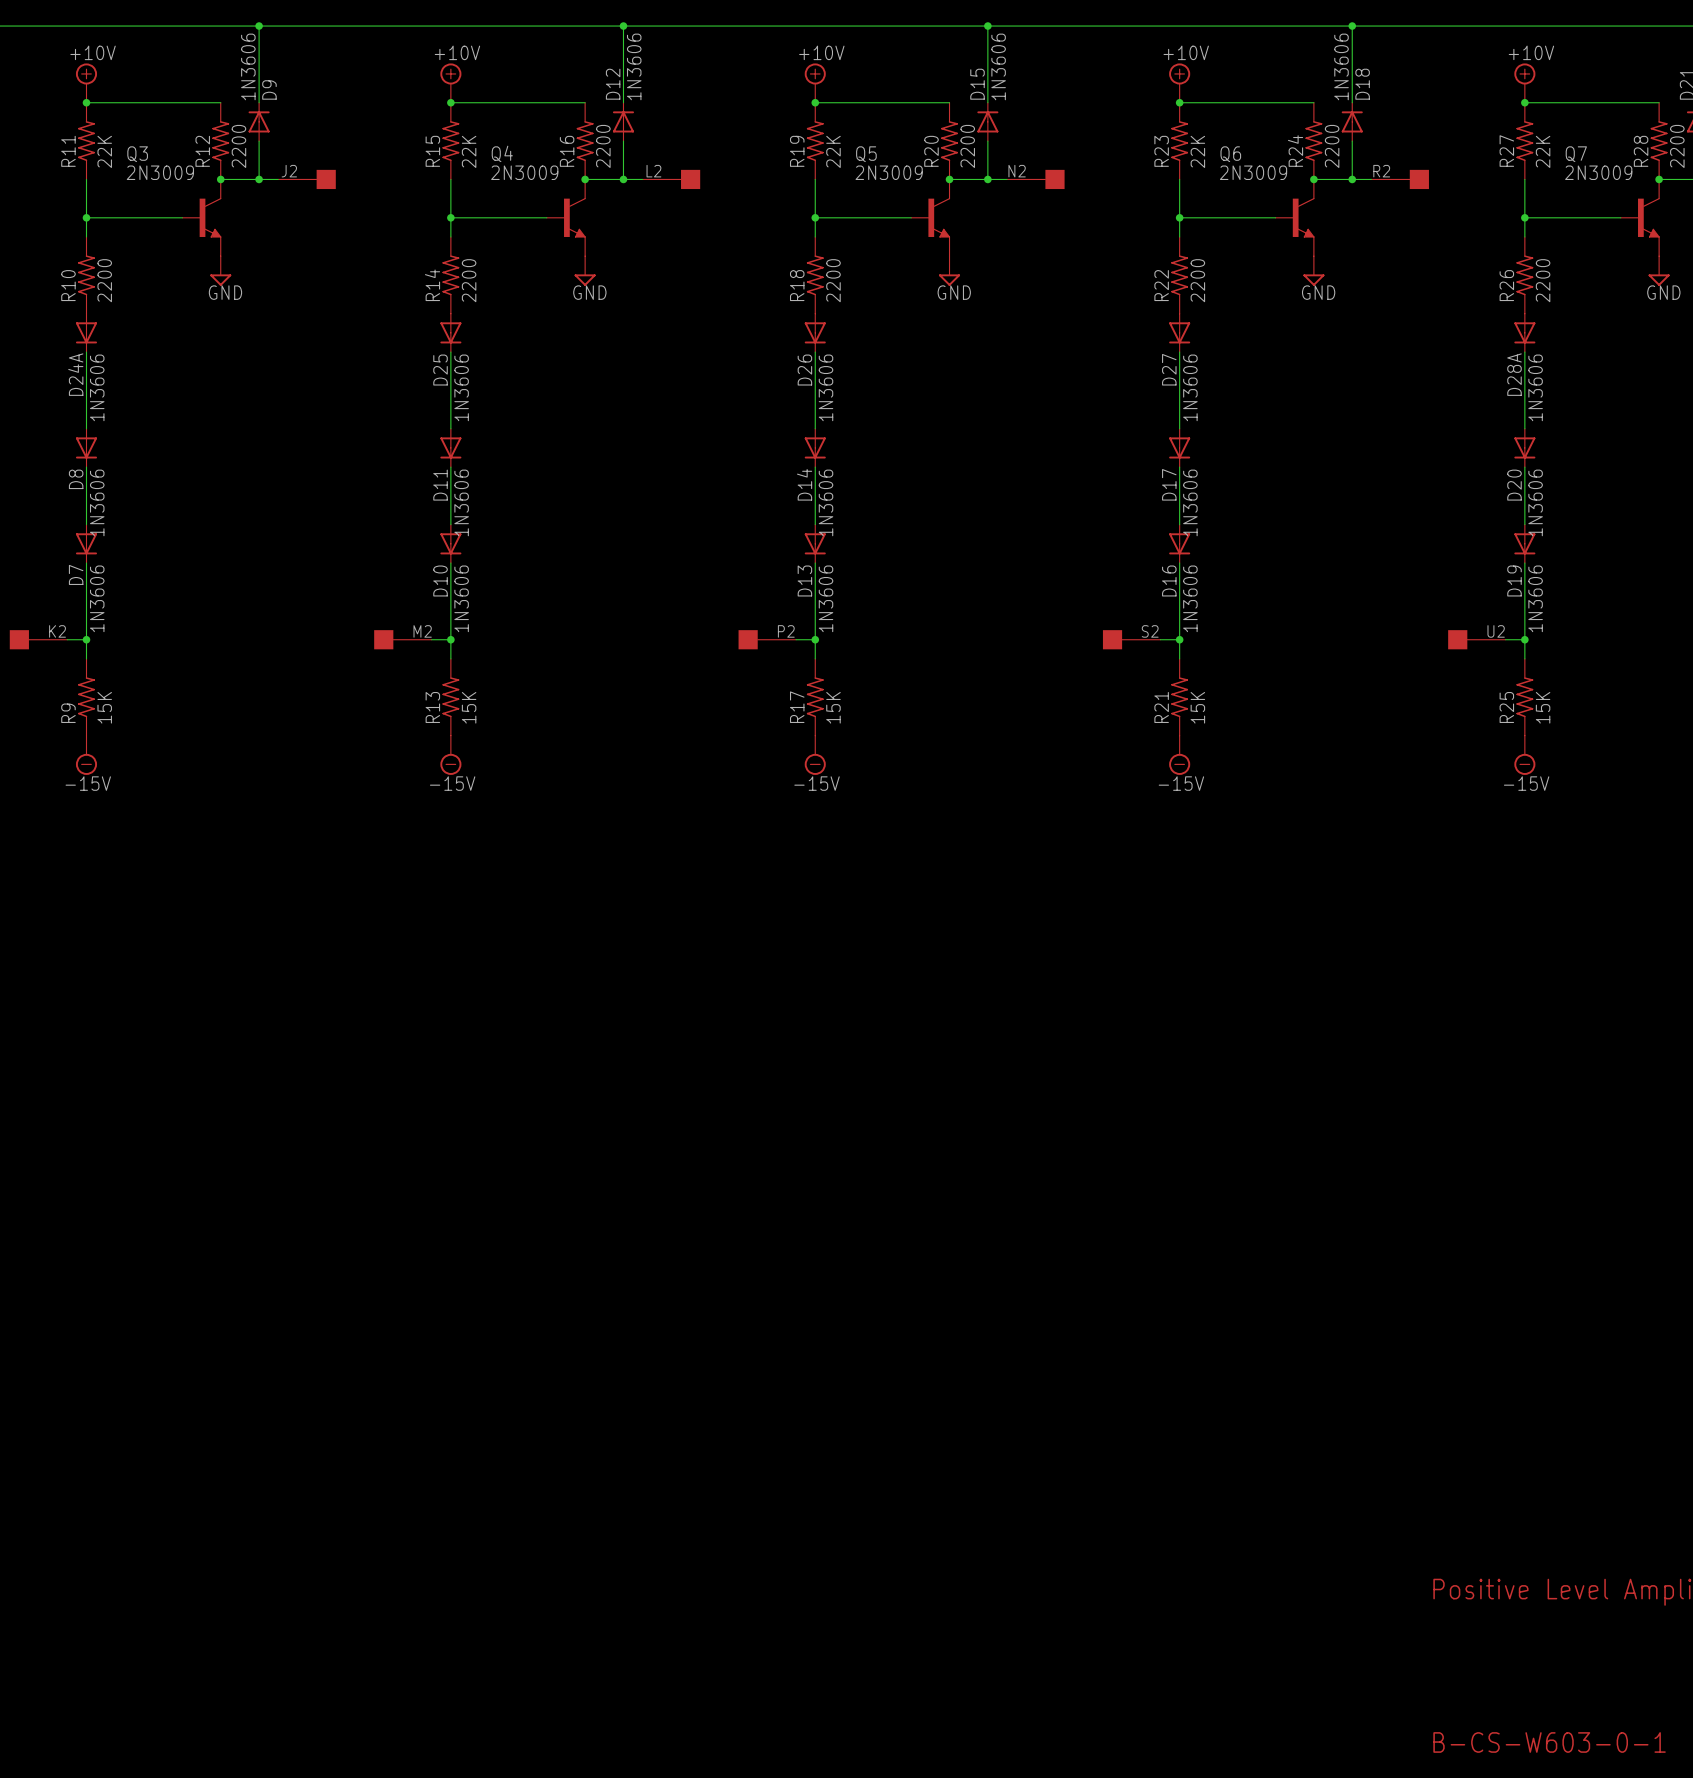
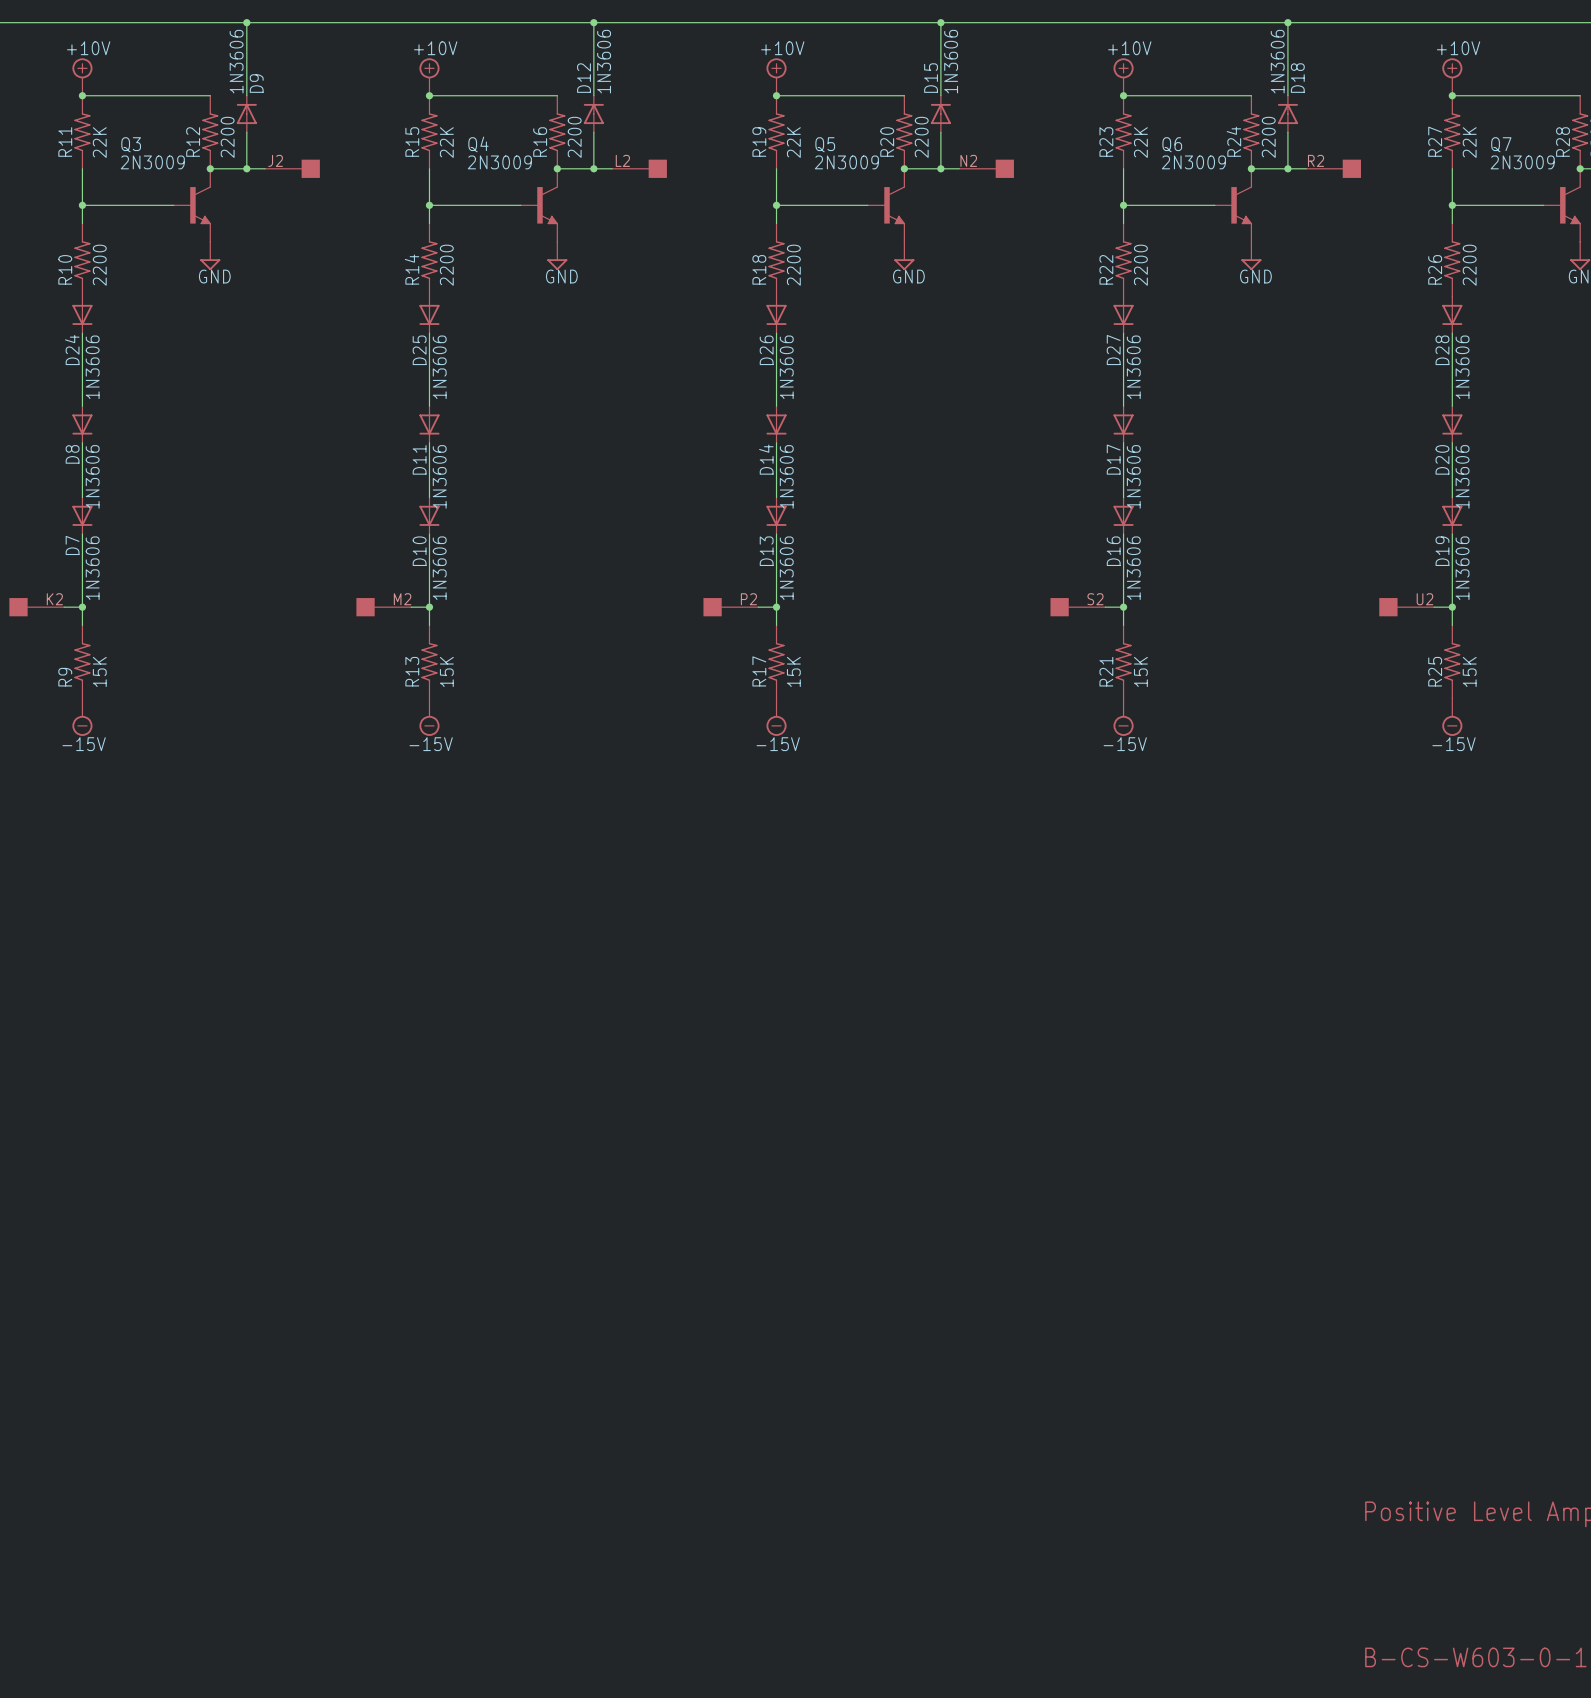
D24A name: D24A (75, 374) -> D24 (72, 350)
D28A name: D28A (1514, 374) -> D28 (1442, 350)

